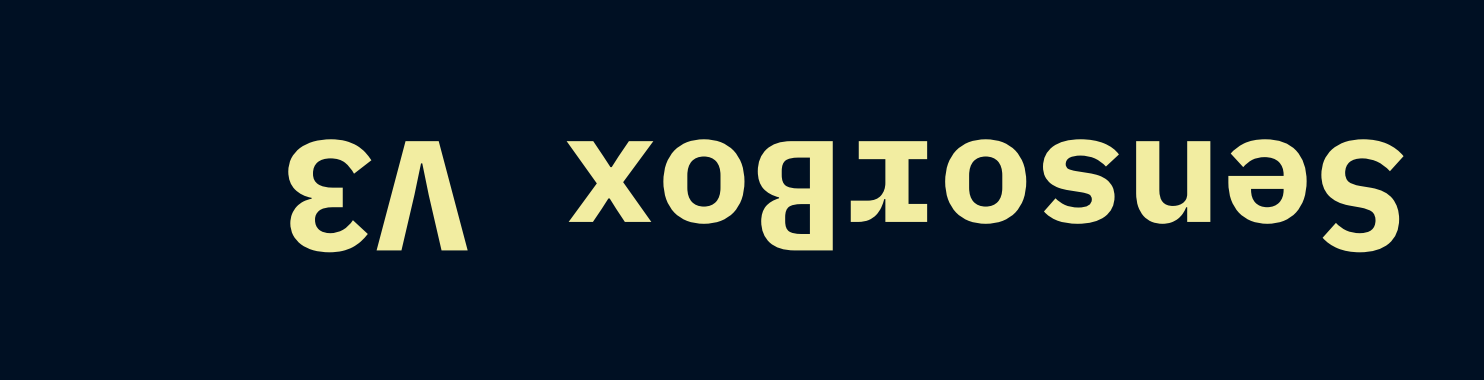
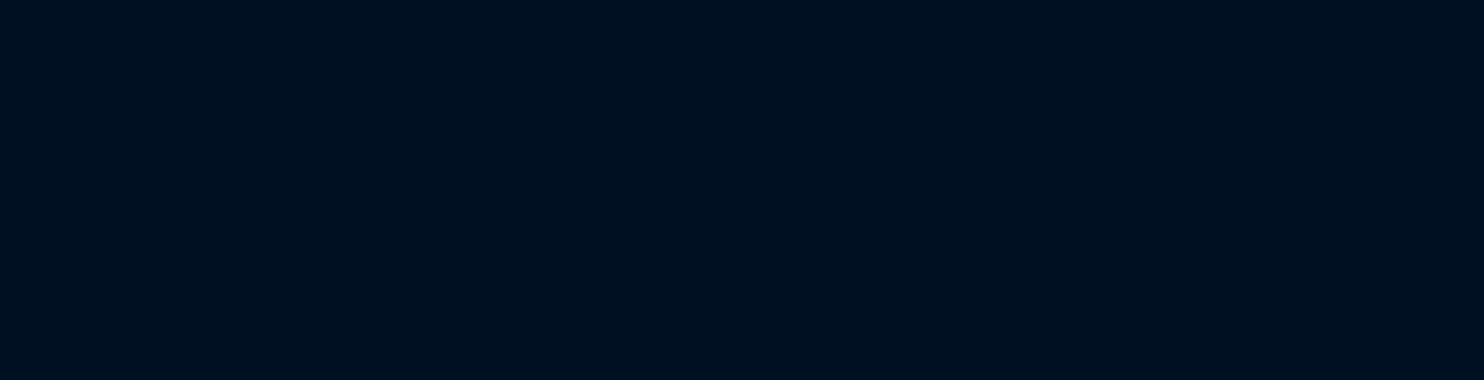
text: SensorBox V3 (845, 195) -> none

